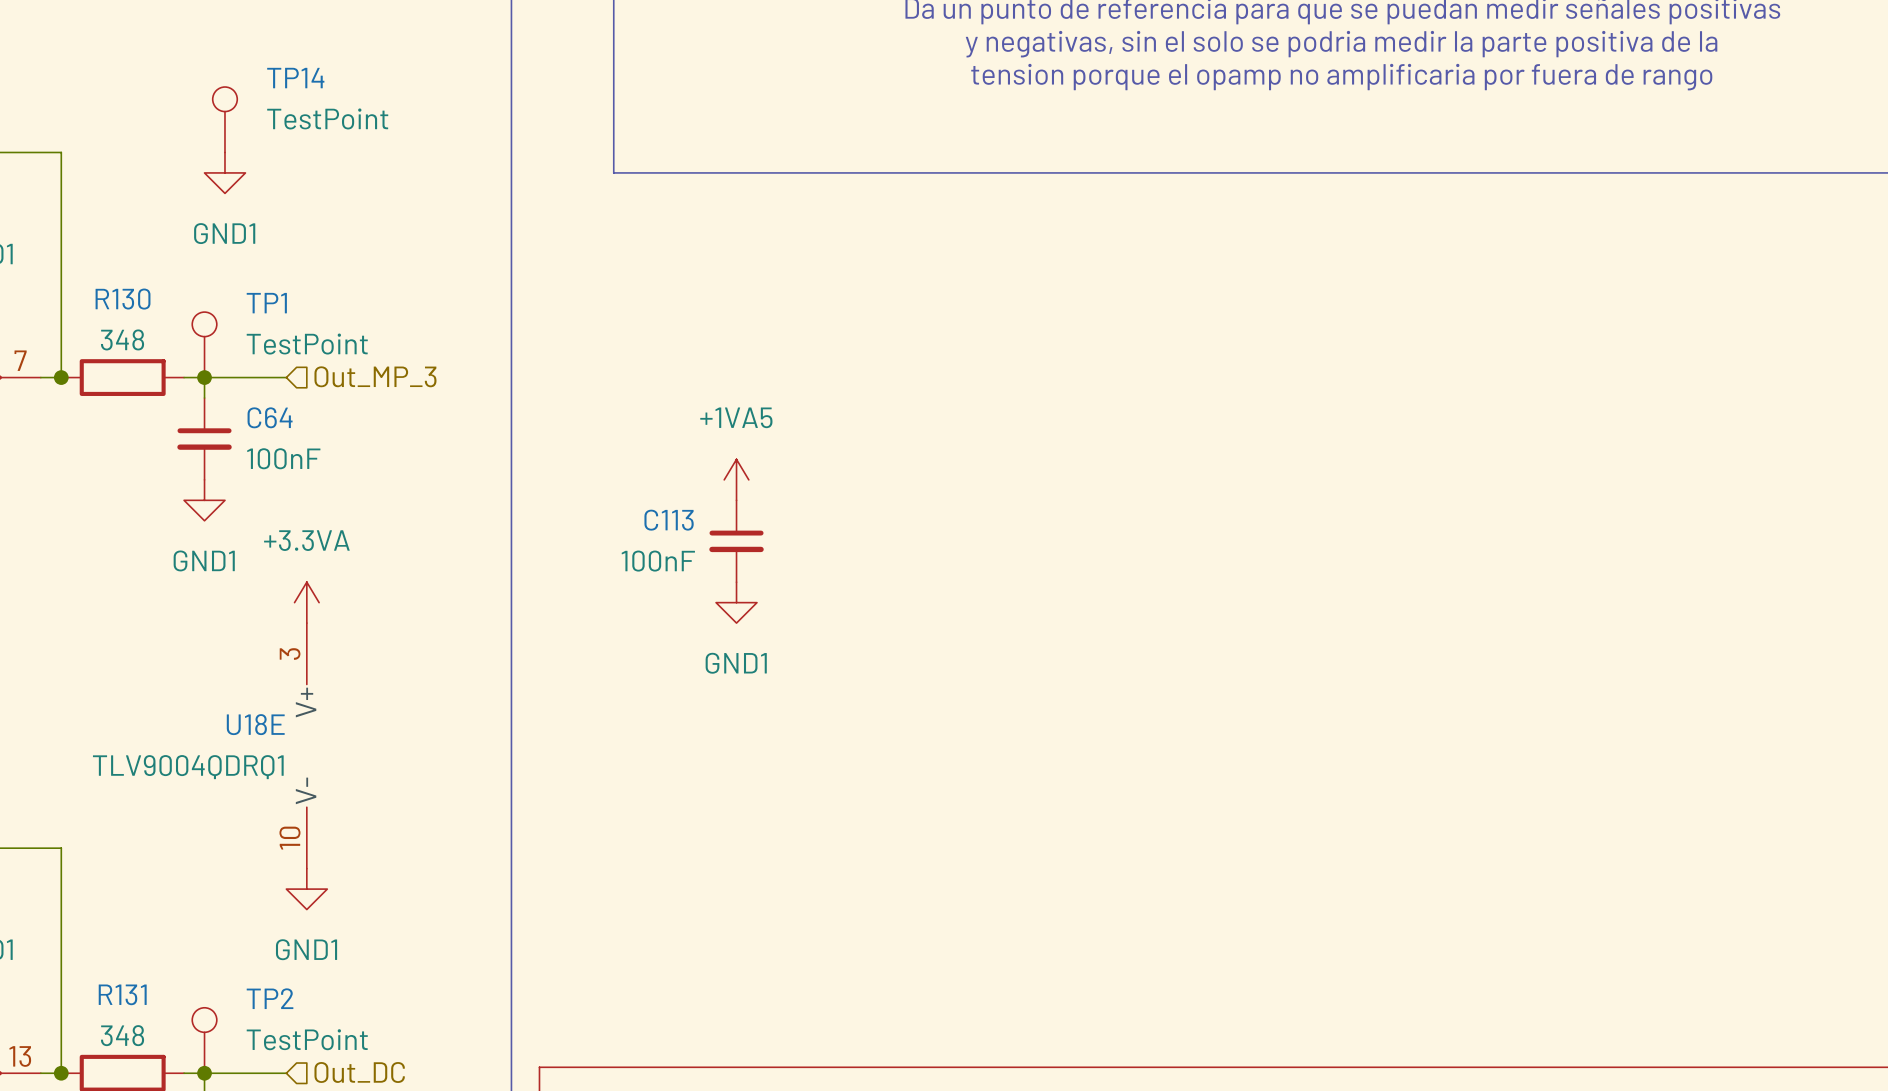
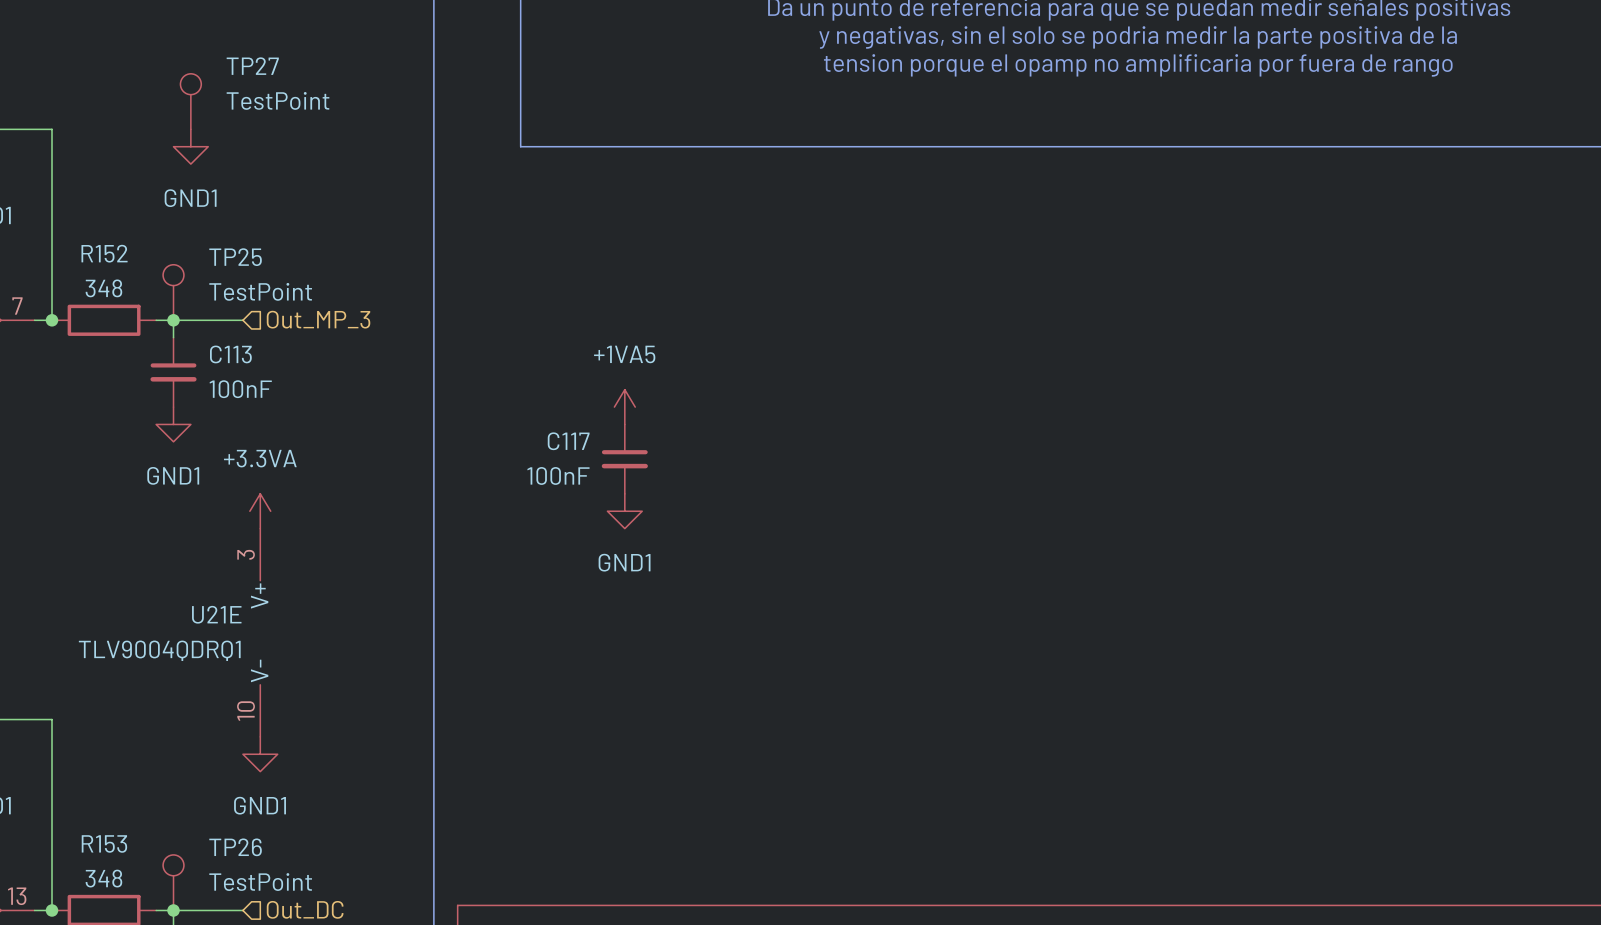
TP14 name: TP14 (295, 78) -> TP27 (252, 66)
R130 name: R130 (123, 299) -> R152 (104, 253)
TP1 name: TP1 (266, 303) -> TP25 (235, 257)
C64 name: C64 (270, 417) -> C113 (230, 354)
C113 name: C113 (669, 520) -> C117 (568, 441)
U18E name: U18E (255, 724) -> U21E (216, 614)
R131 name: R131 (122, 994) -> R153 (104, 843)
TP2 name: TP2 (270, 998) -> TP26 (235, 847)

